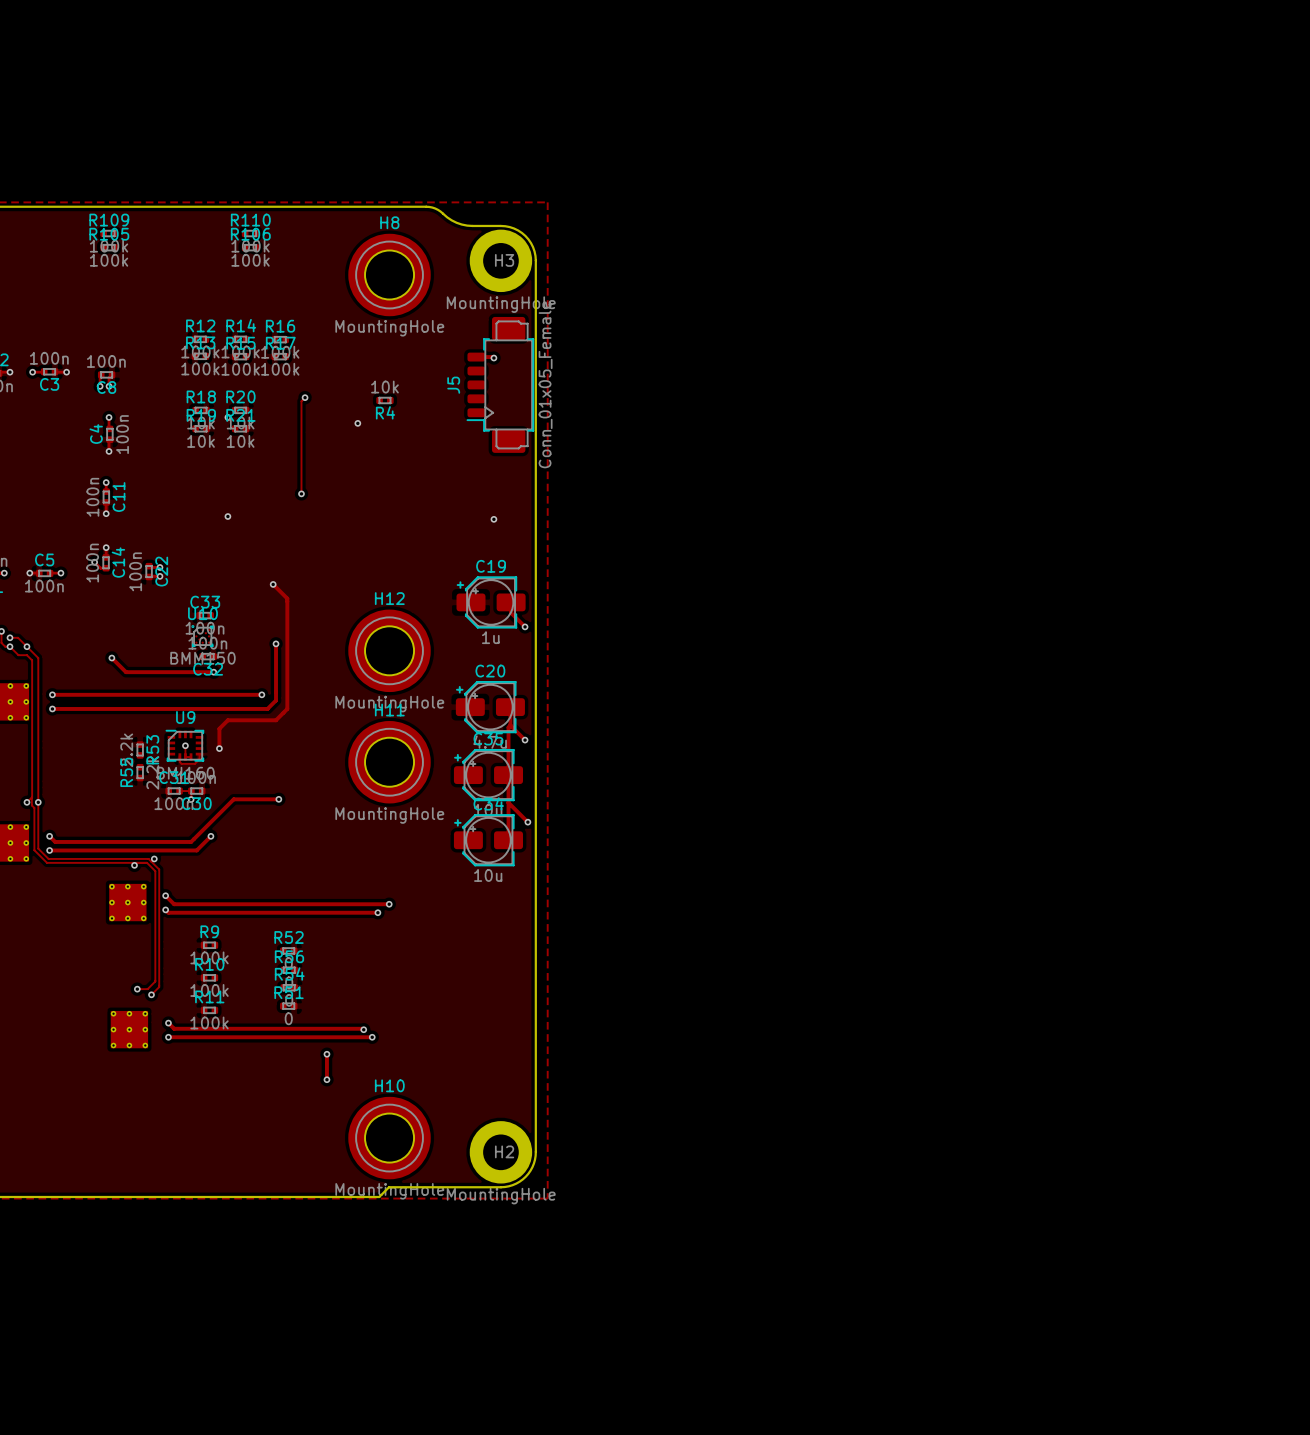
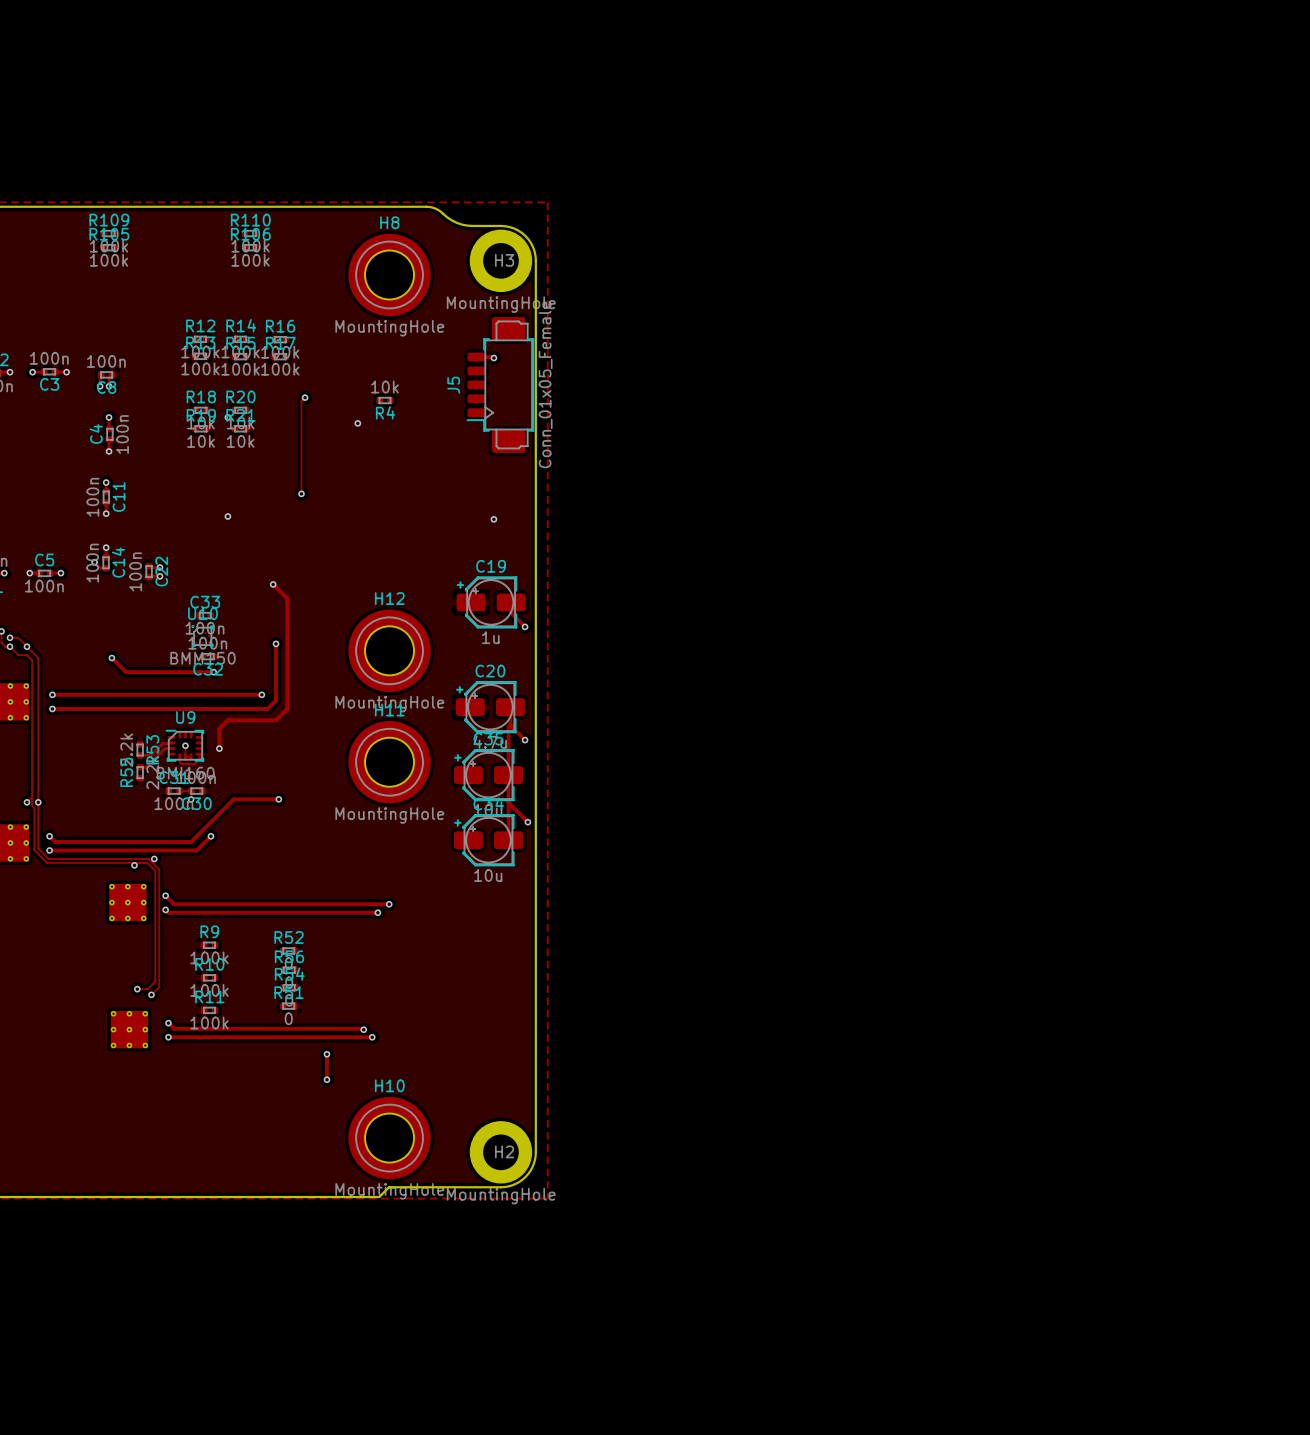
track: none -> (171, 742) (162, 743) (150, 755) (140, 755)
track: none -> (171, 748) (164, 748) (146, 767) (140, 767)

